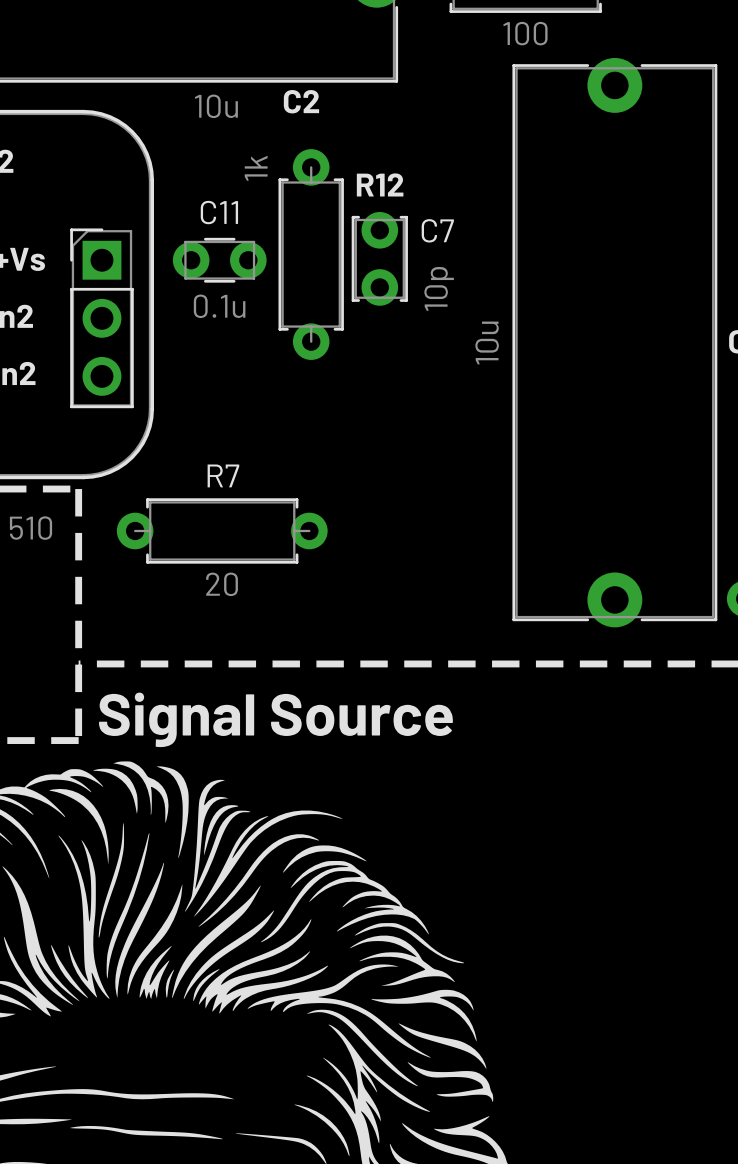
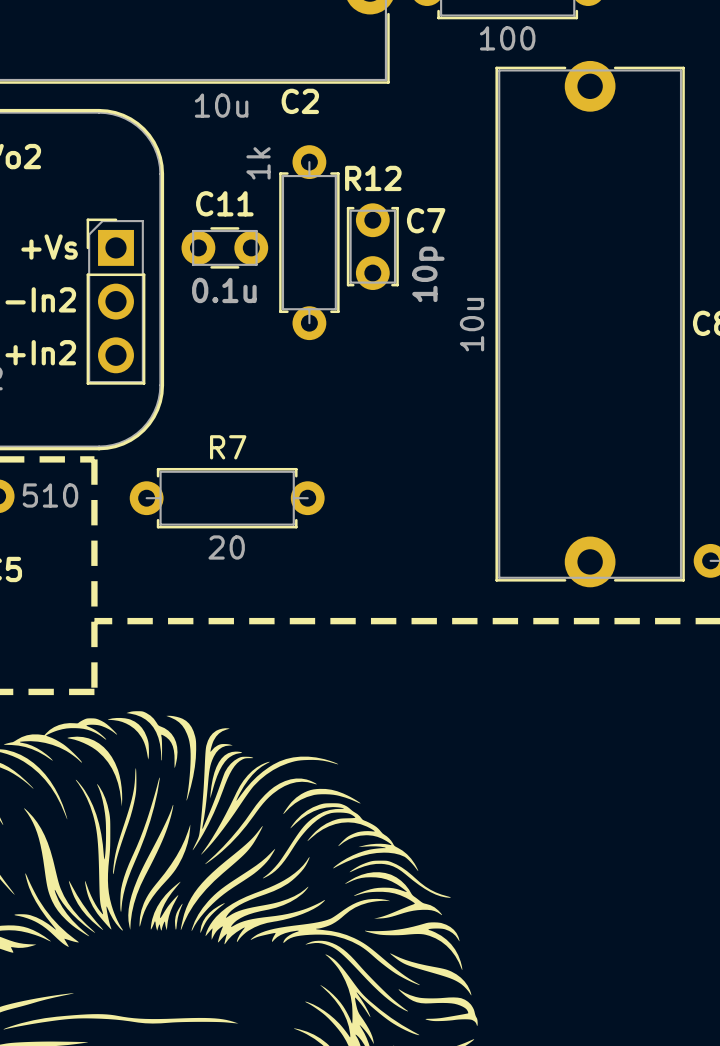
text: Signal Source (276, 719) -> none

